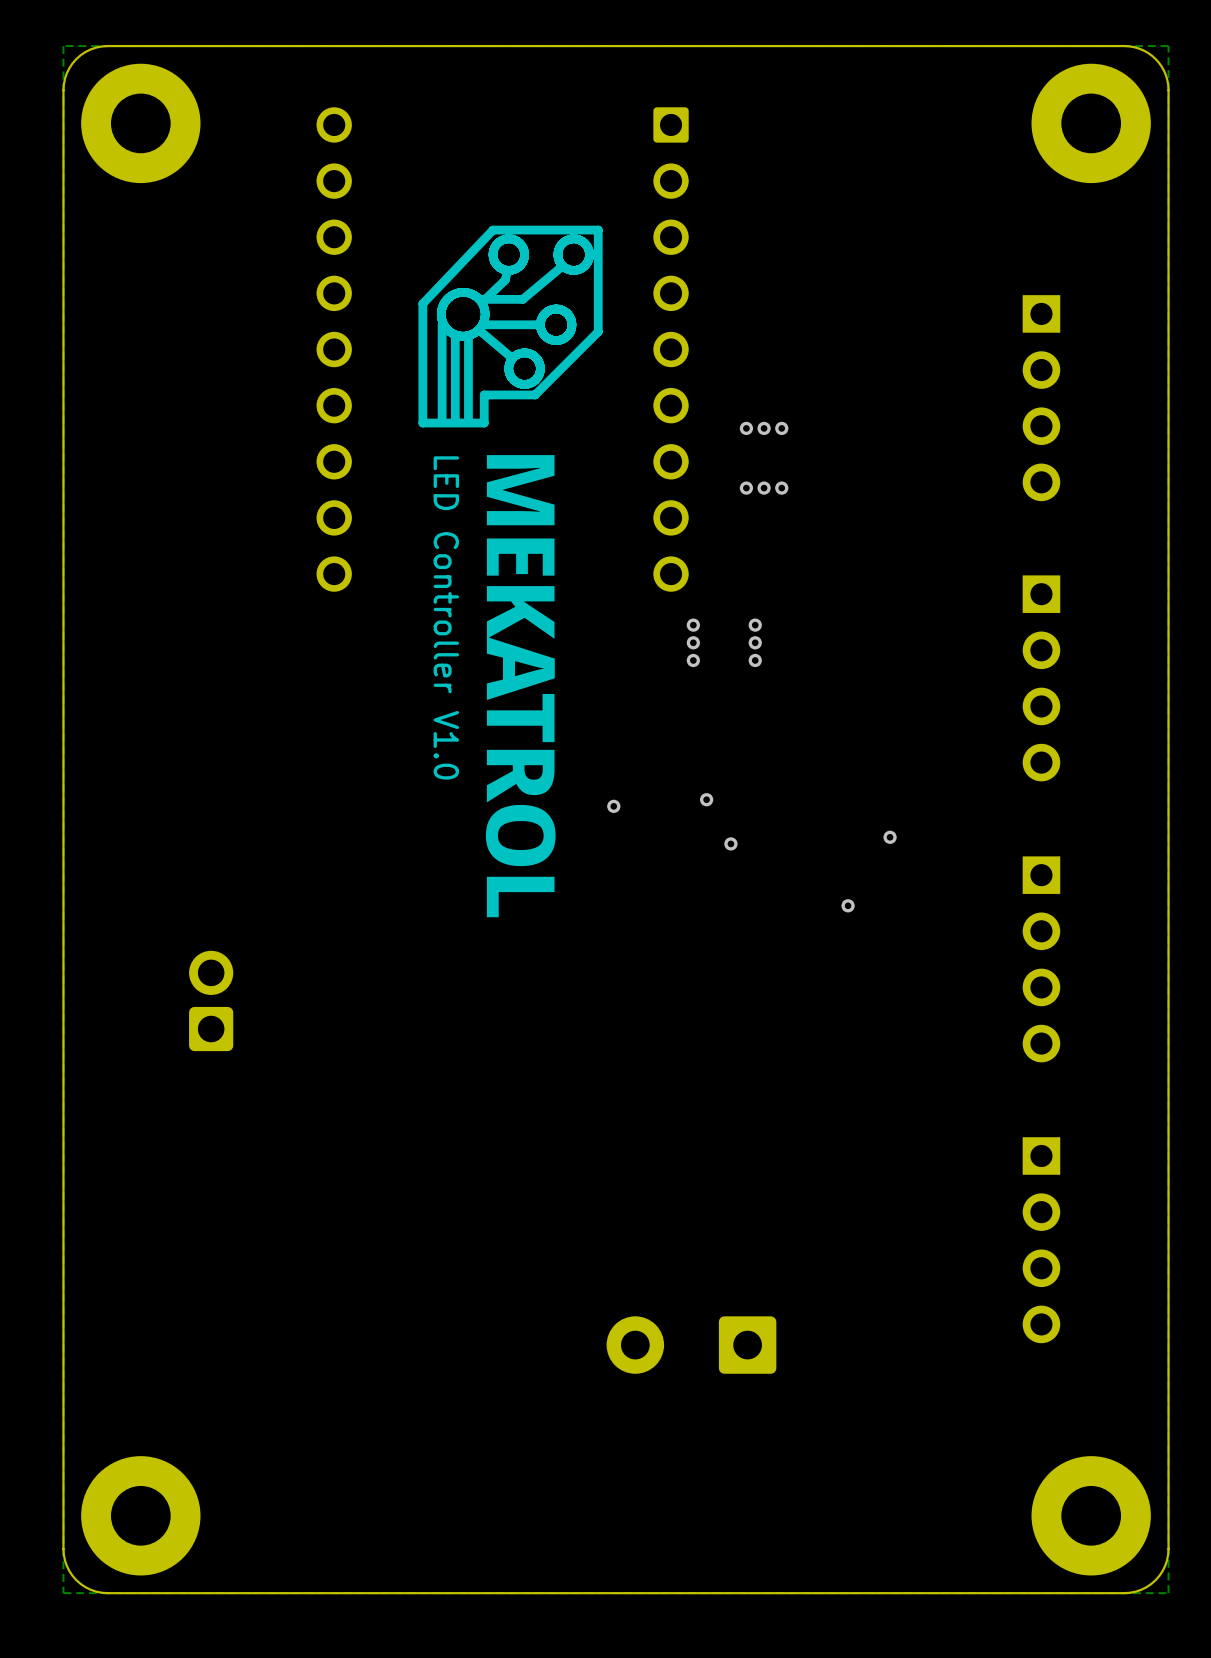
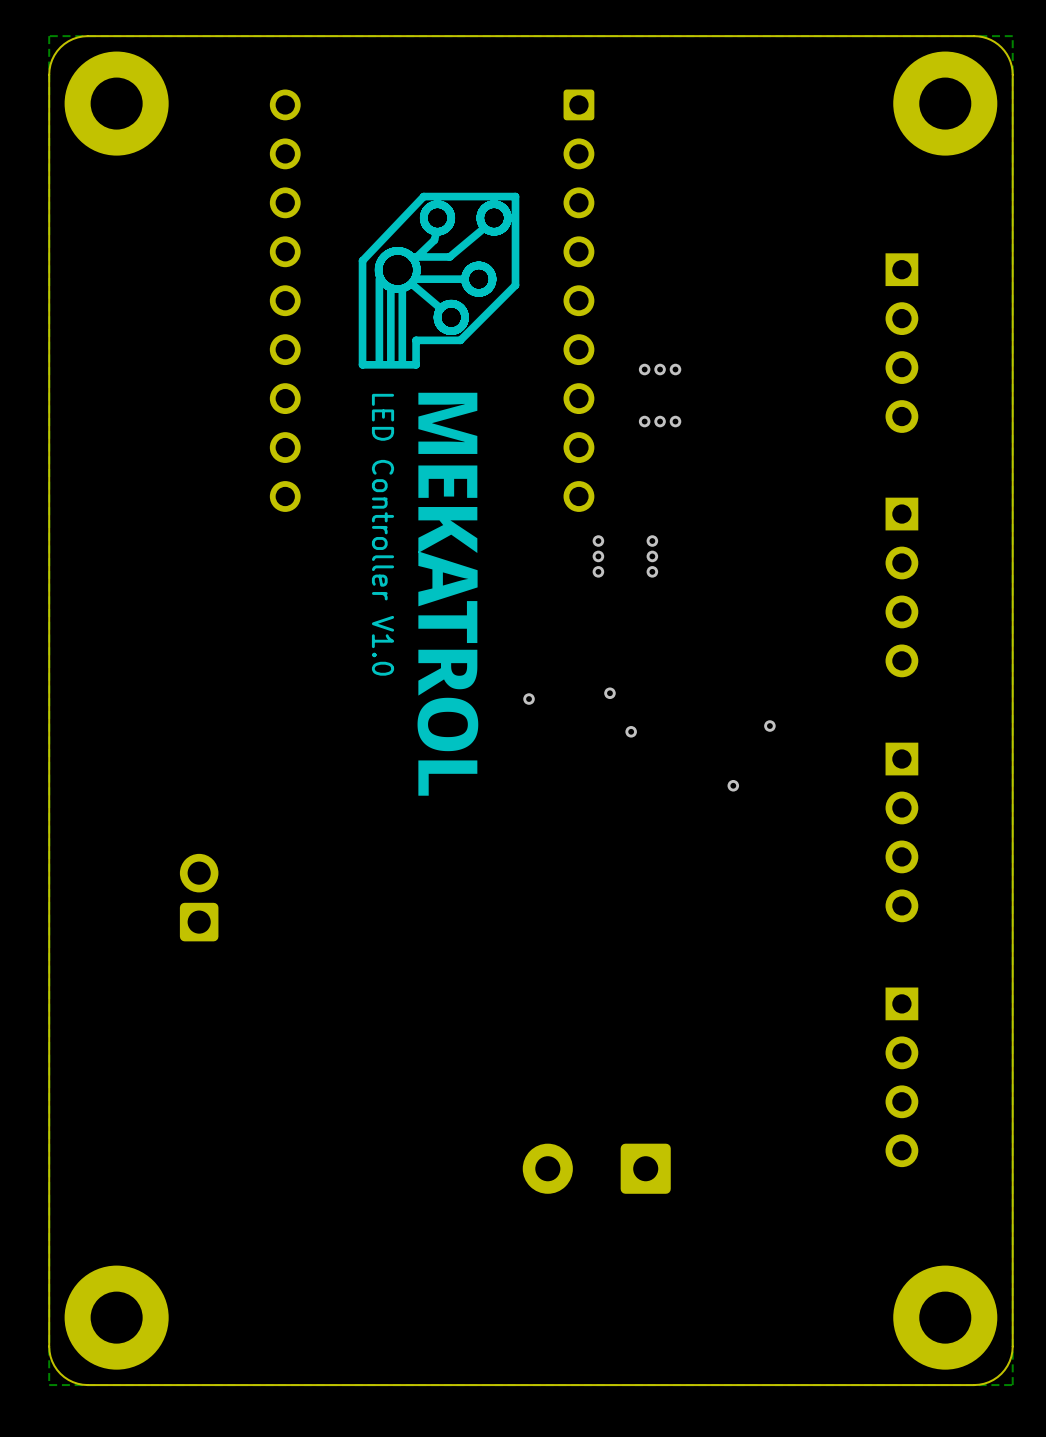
part position: (211, 1000) -> (199, 897)

